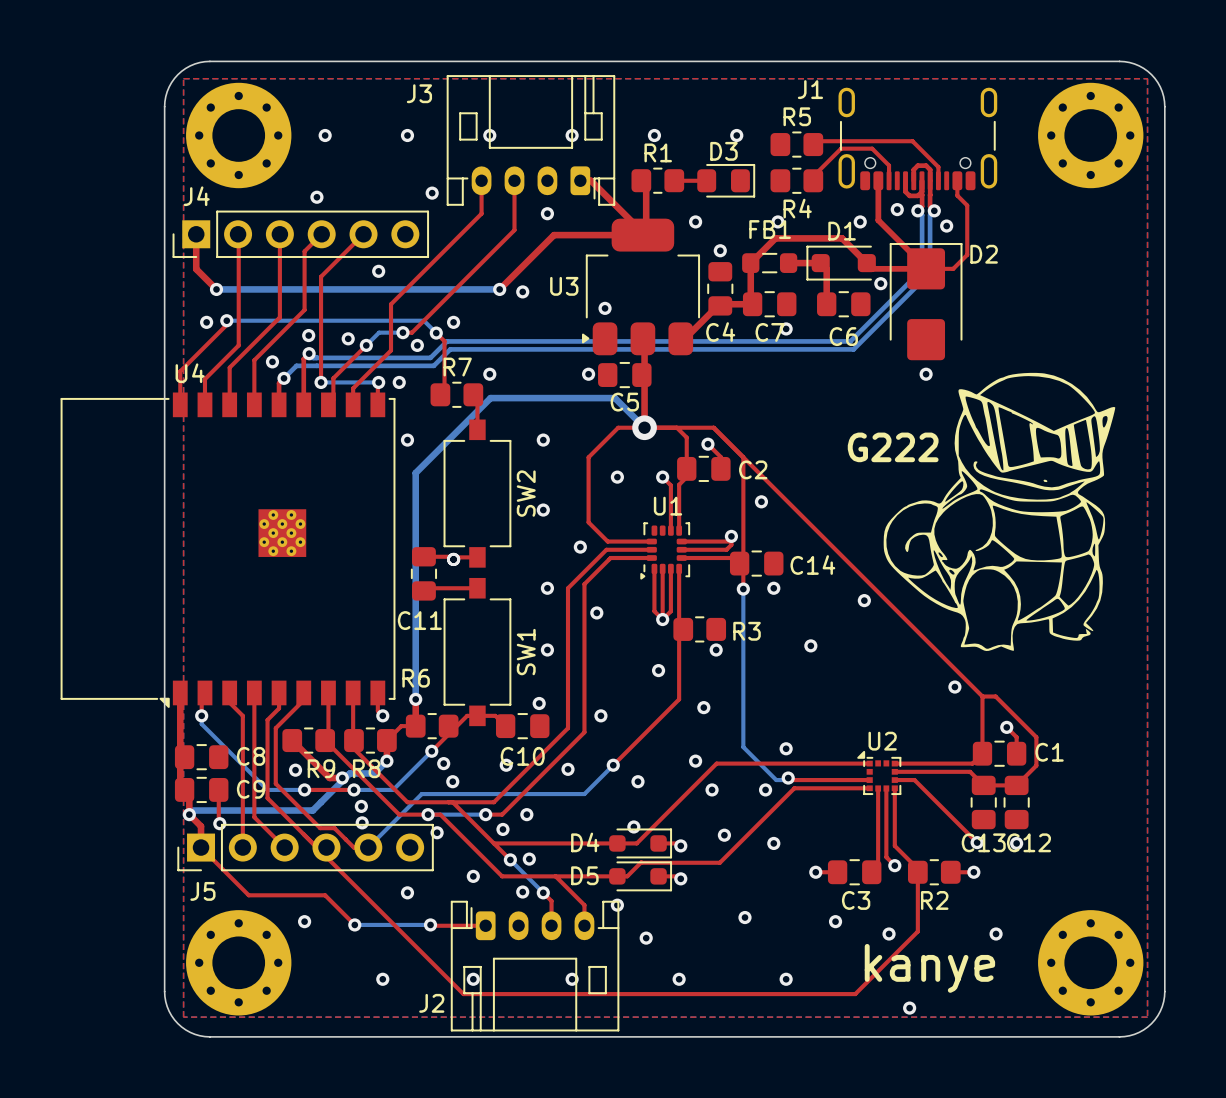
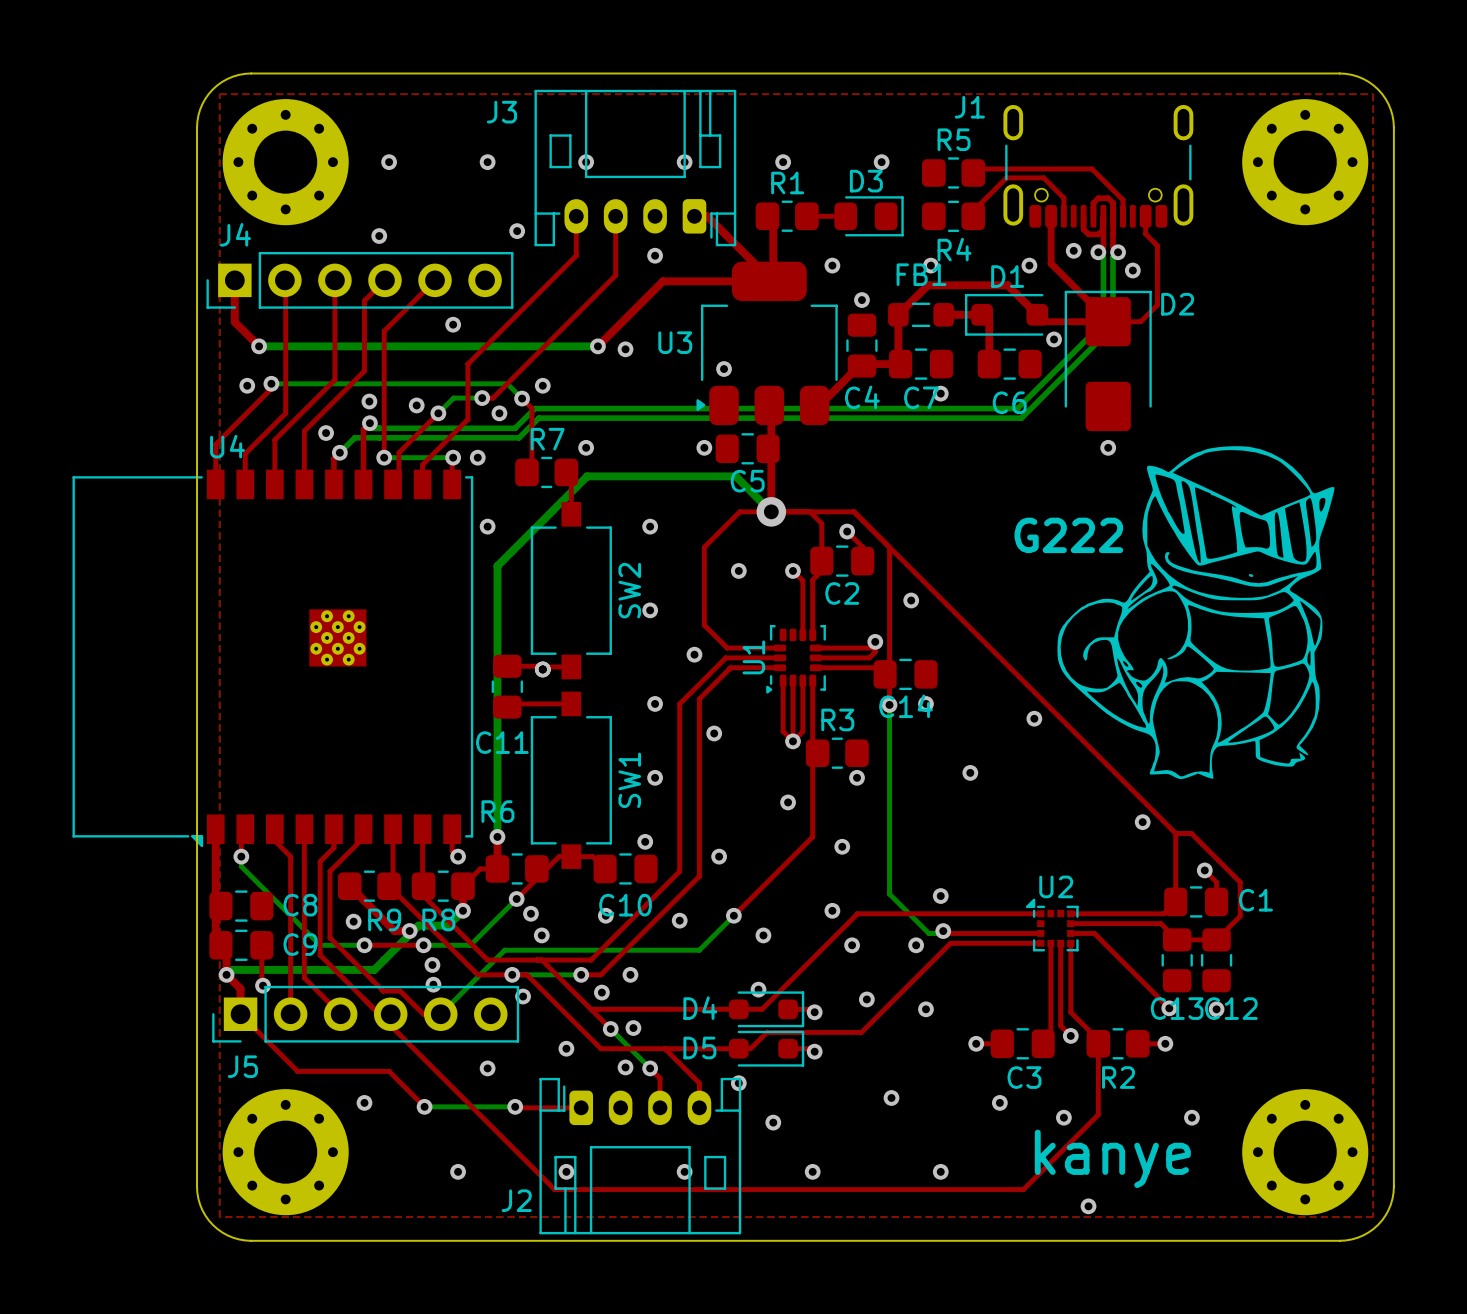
C2 name position: C2 (753, 469) -> C2 (842, 593)
U1 name rotation: 0° (668, 506) -> 90° counterclockwise (753, 657)
U1 name position: U1 (668, 506) -> U1 (753, 657)
C14 name position: C14 (812, 565) -> C14 (906, 706)
R3 name position: R3 (747, 631) -> R3 (837, 719)

